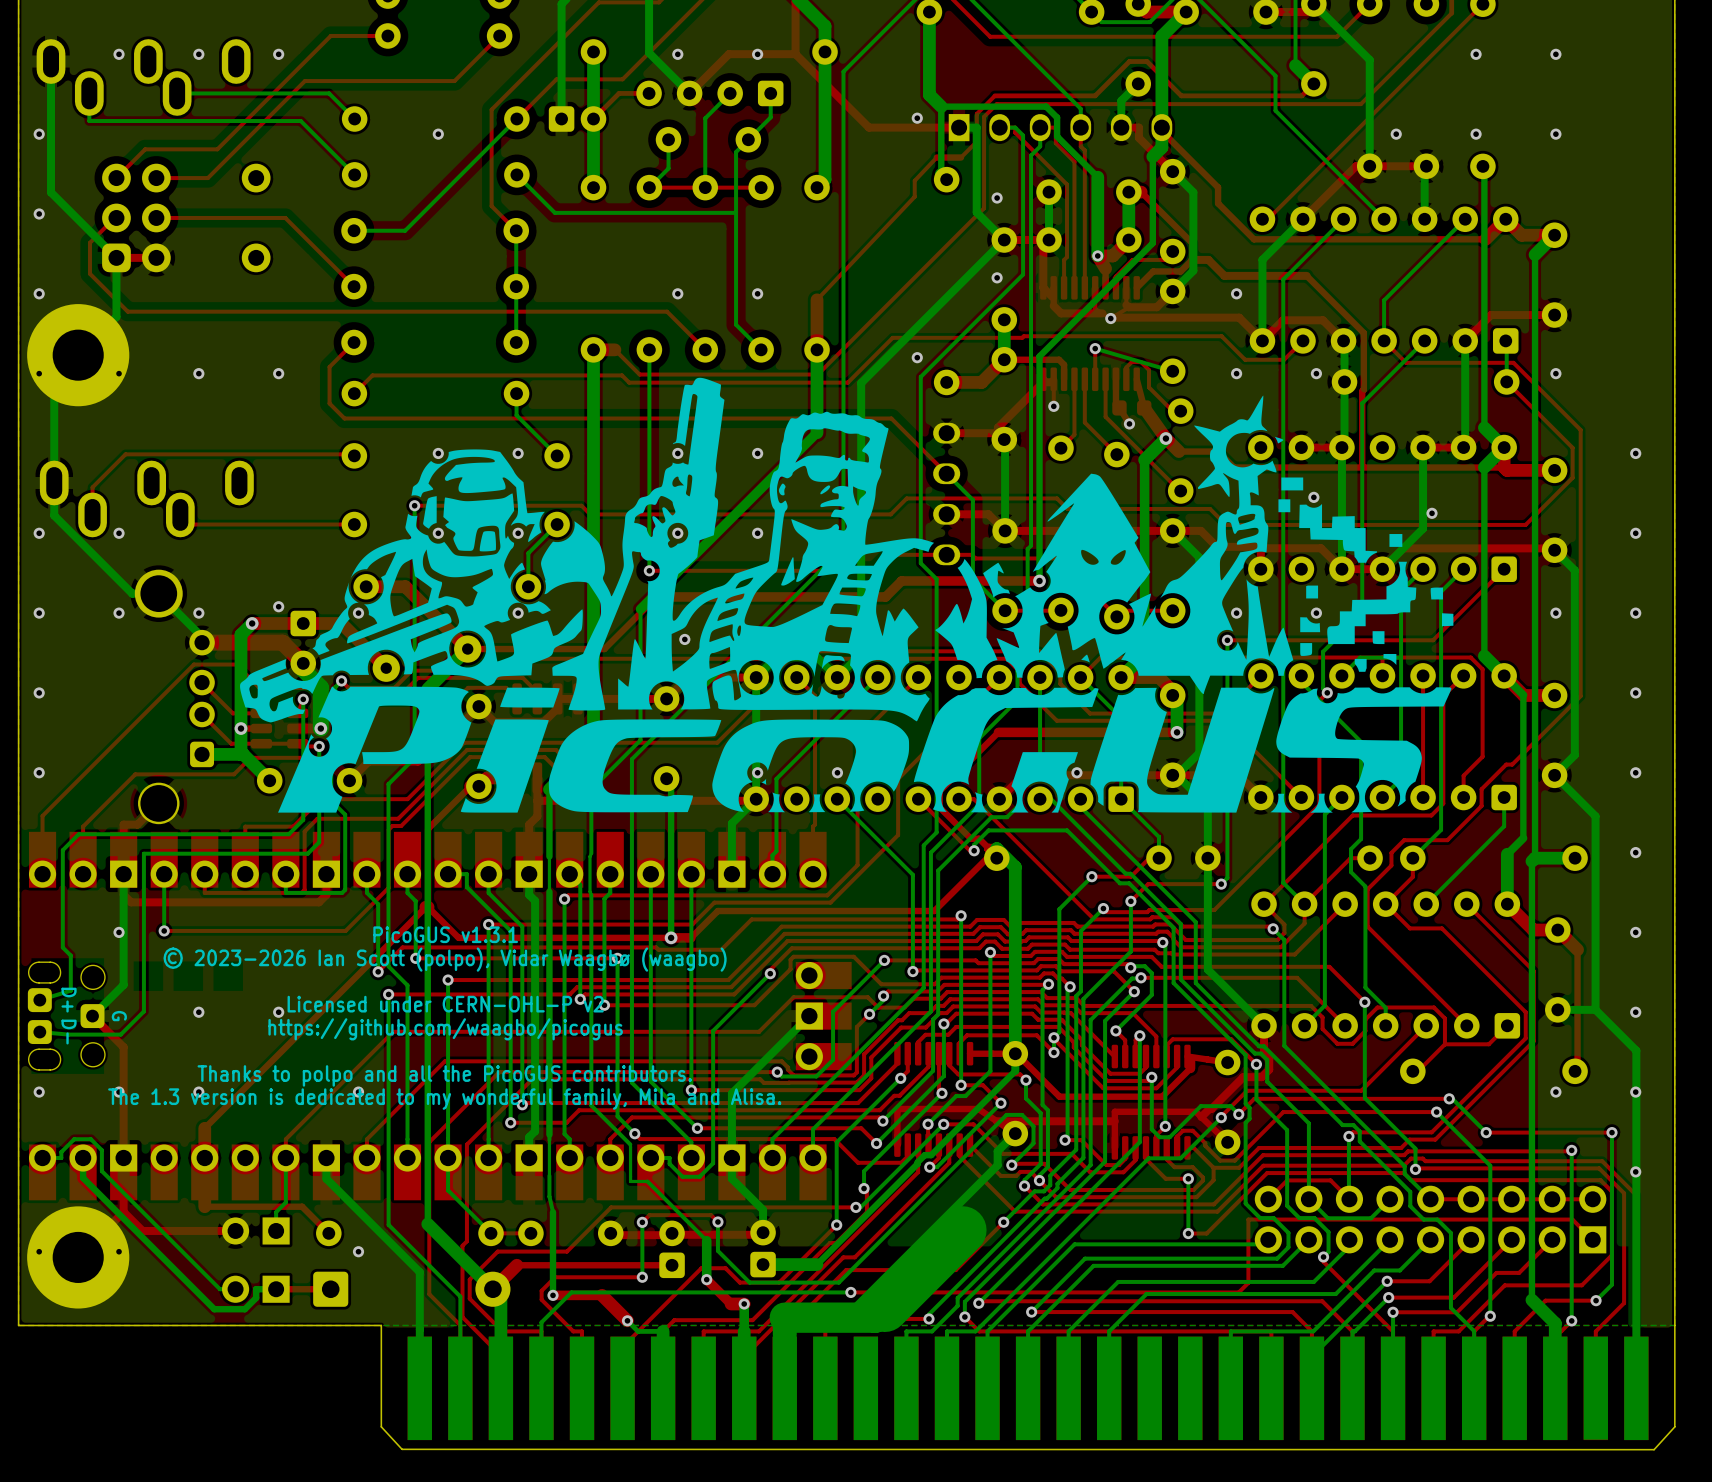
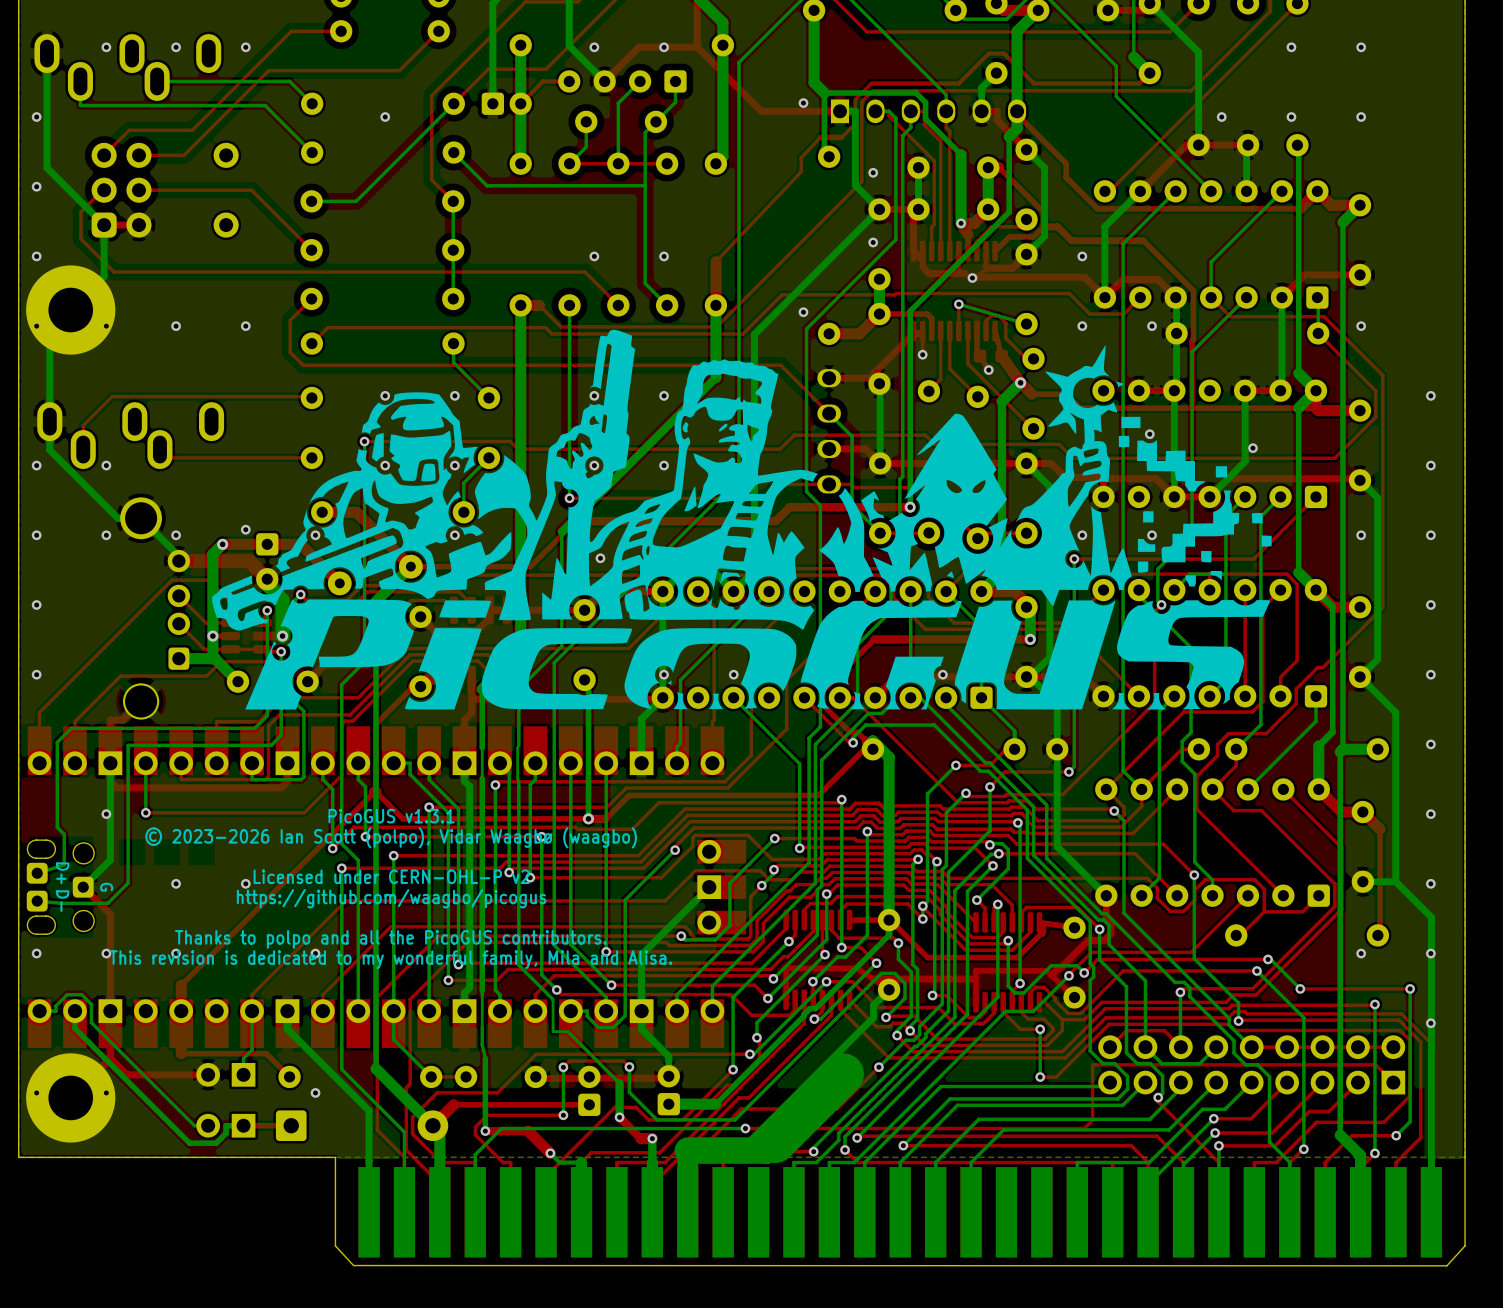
text: The 1.3 version is dedicated to my wonderful family, Mila and Alisa. (444, 1099) -> This revision is dedicated to my wonderful family, Mila and Alisa. (390, 959)

